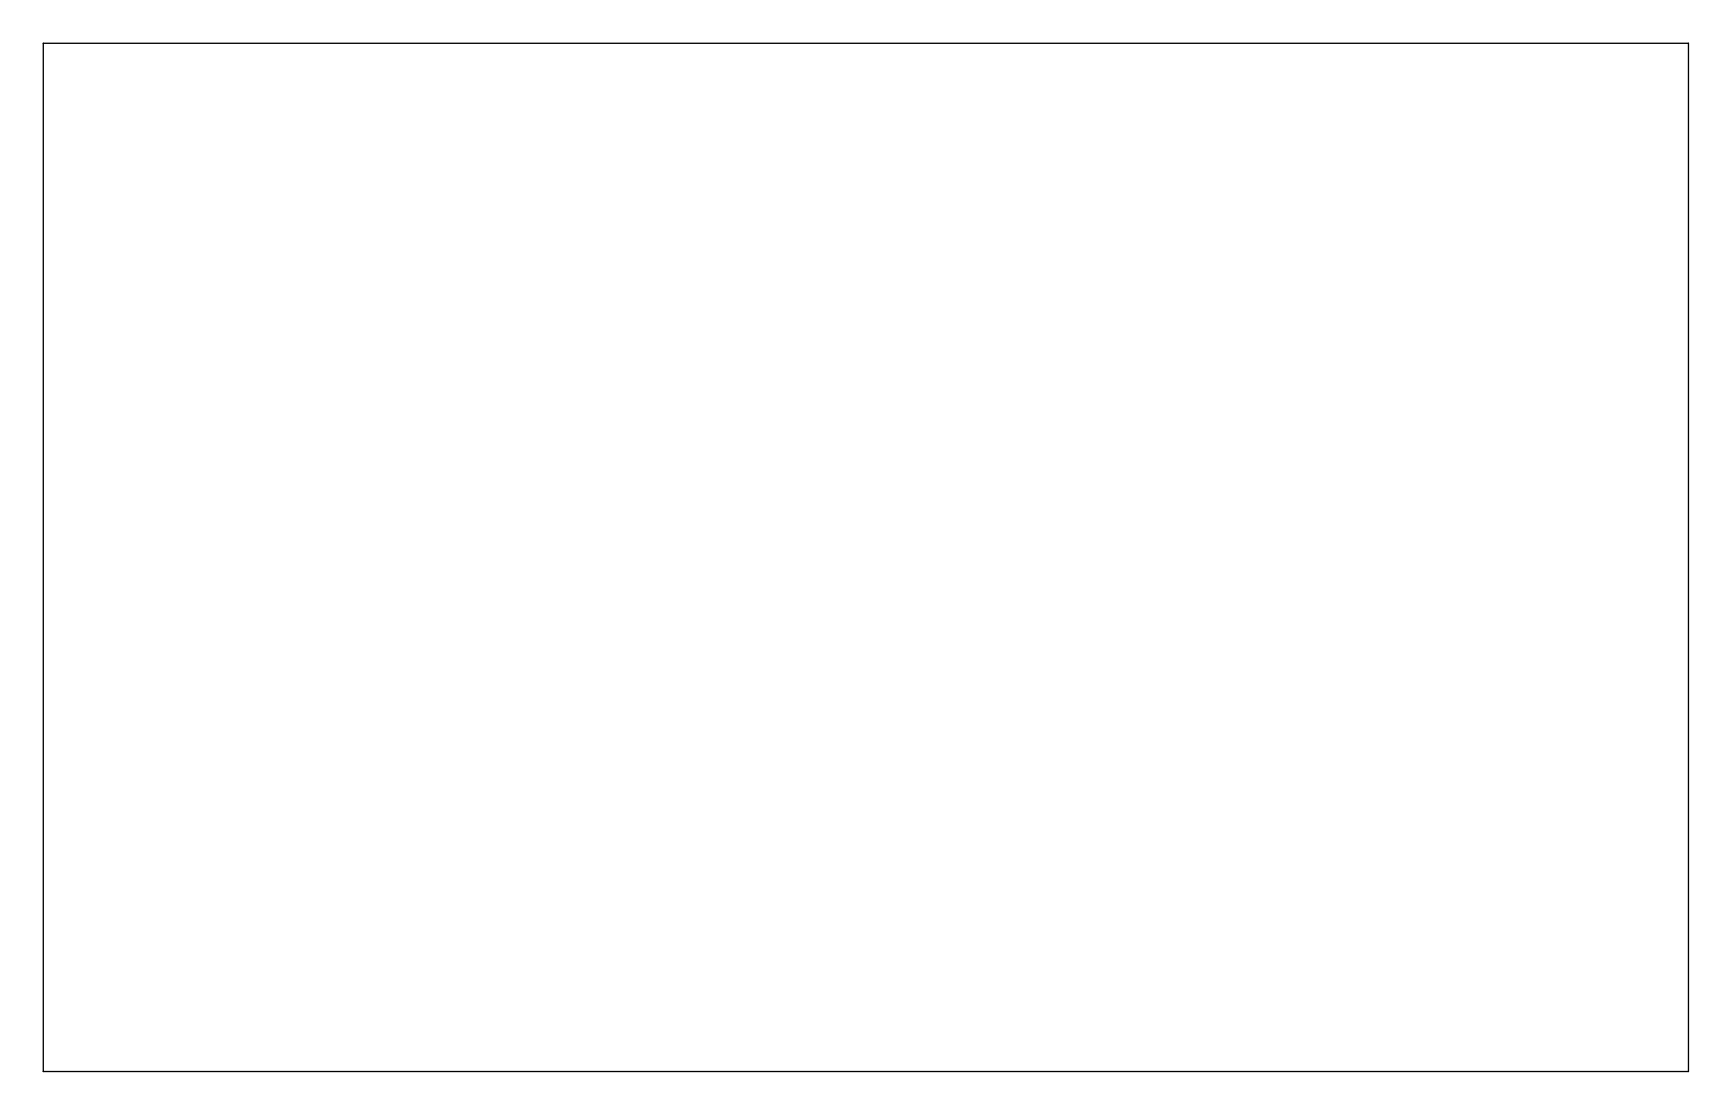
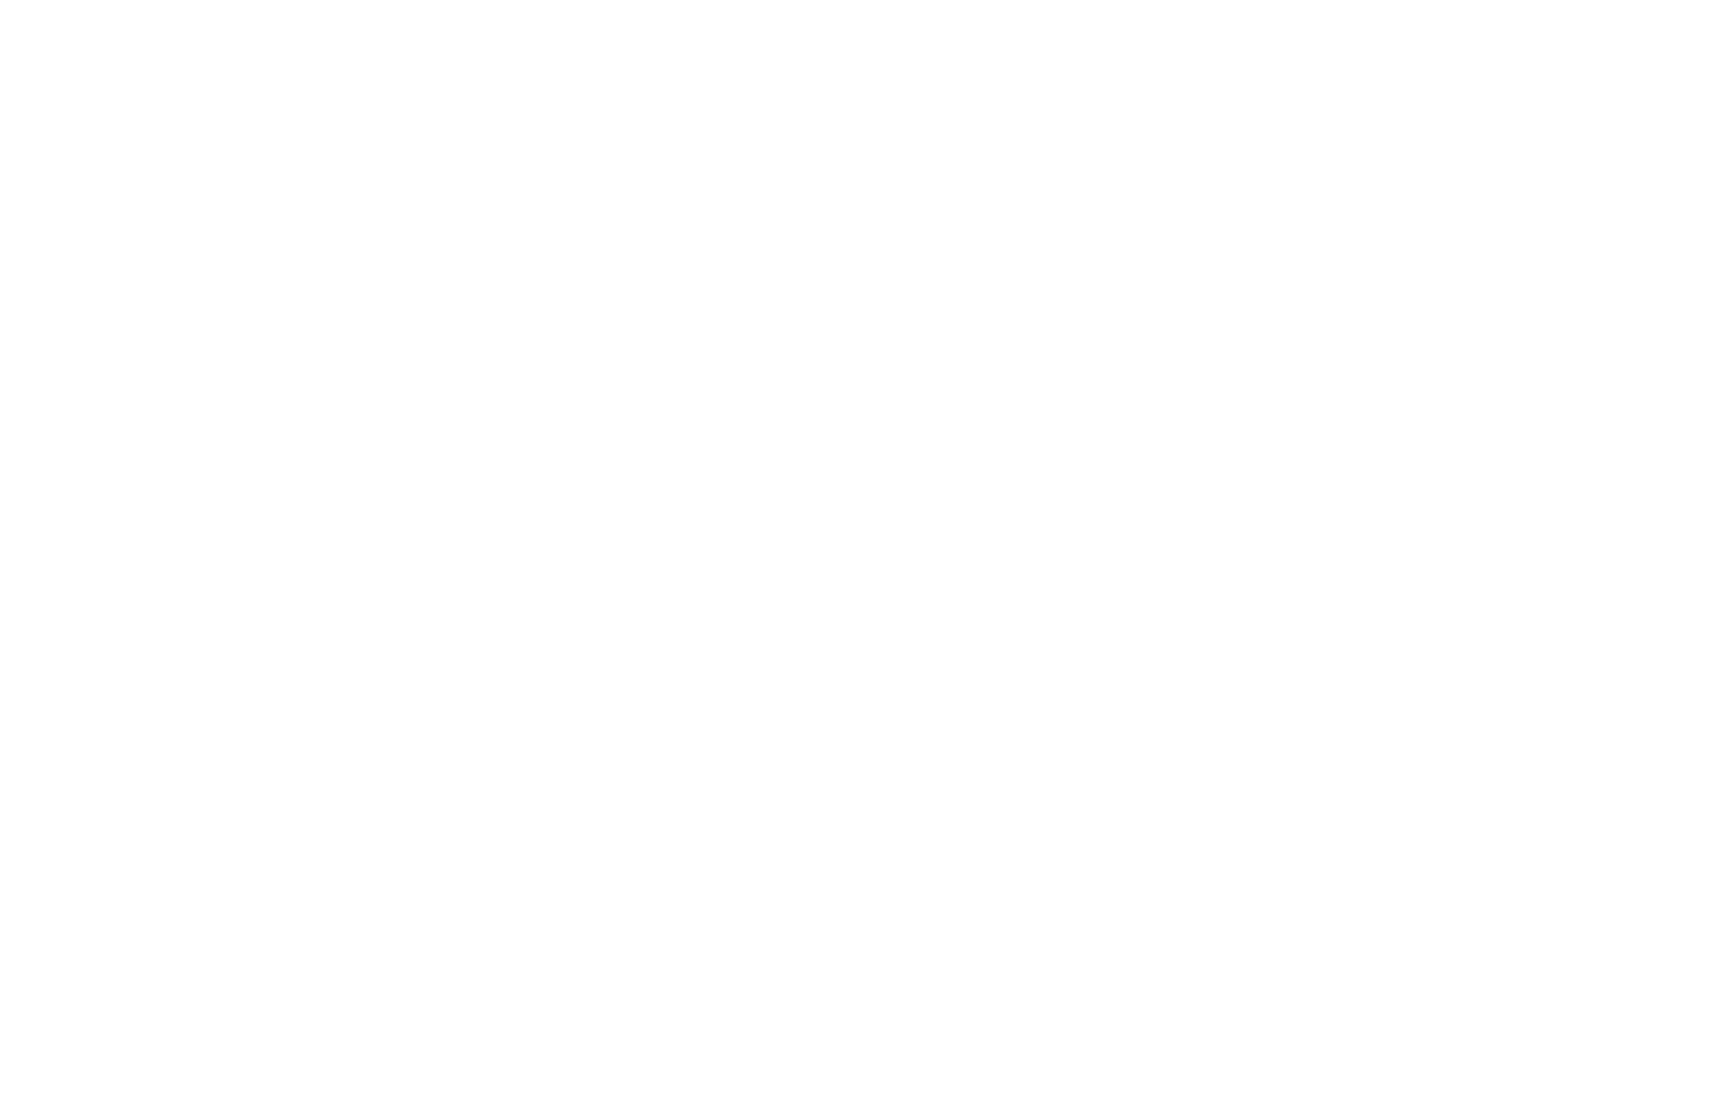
board edge: (43, 43) (1688, 43) (1688, 1071) (43, 1071) (43, 43) -> none

